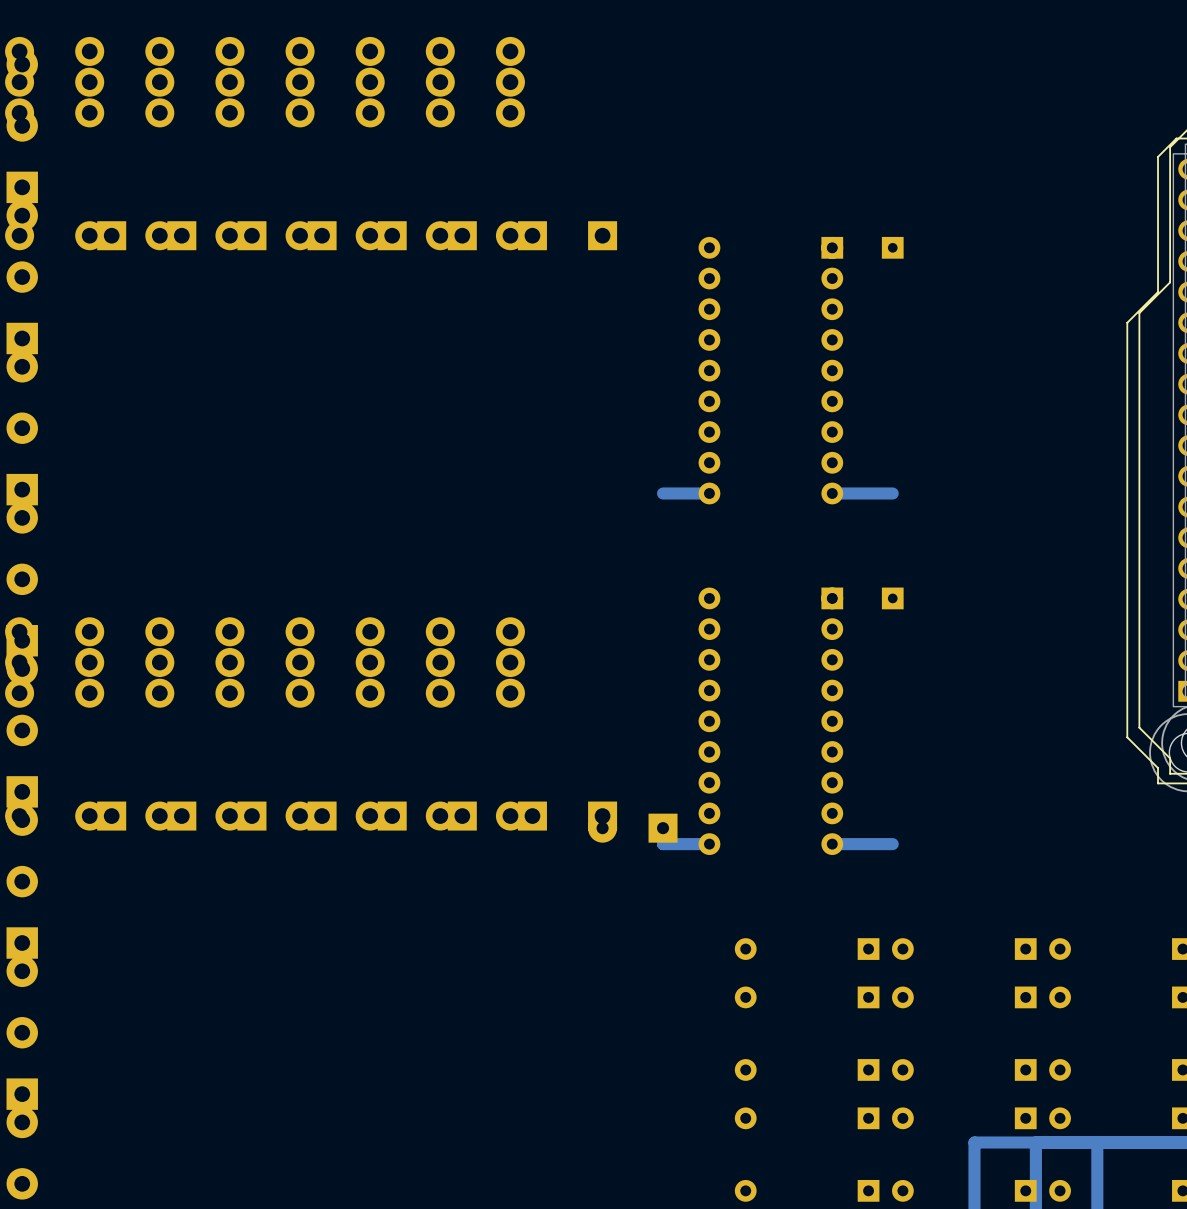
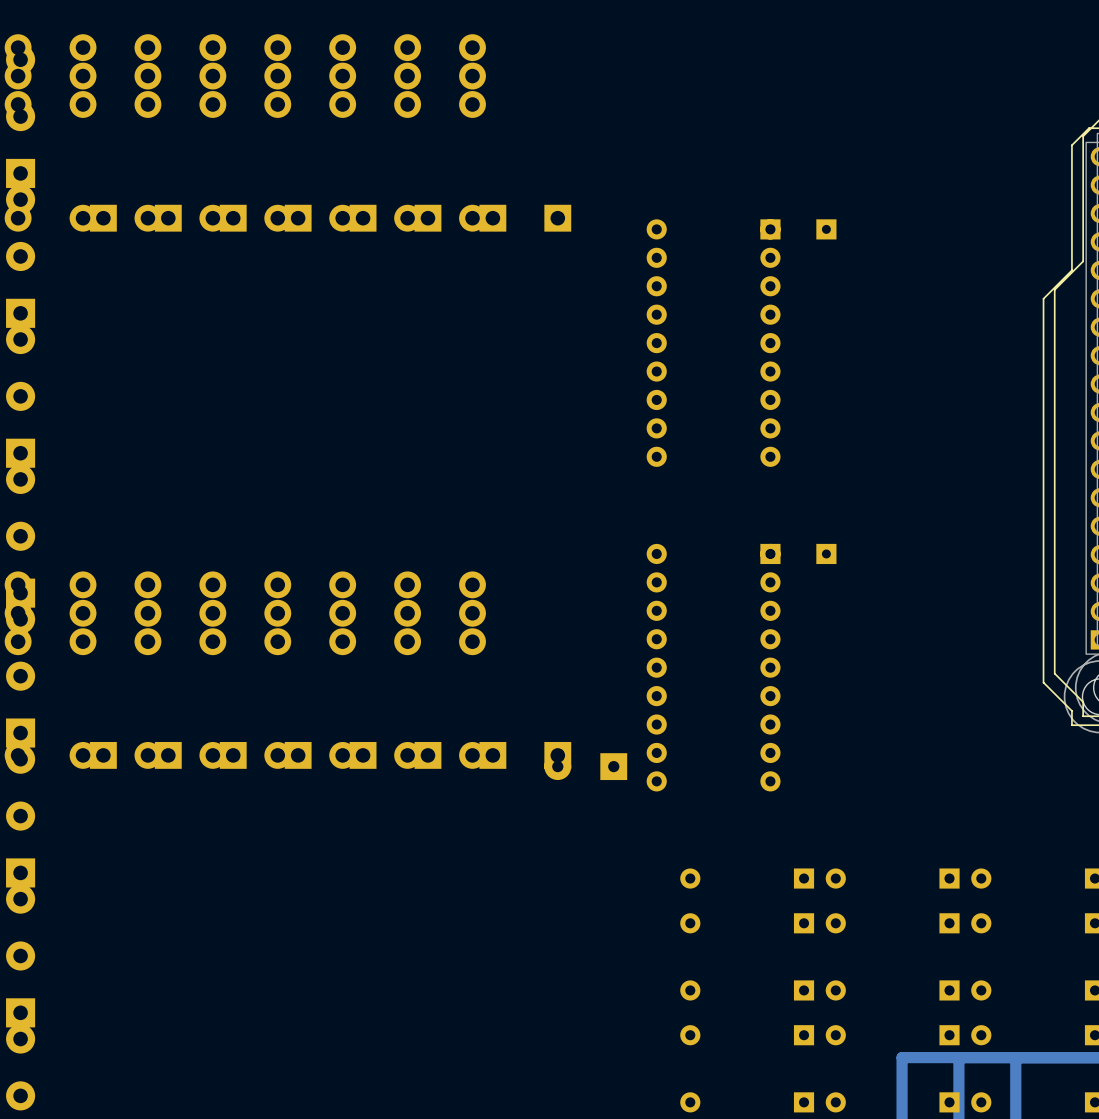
bottom track: (709, 493) (663, 493) -> none
bottom track: (892, 493) (832, 493) -> none
bottom track: (663, 828) (663, 844) (709, 844) -> none
bottom track: (892, 844) (832, 844) -> none

